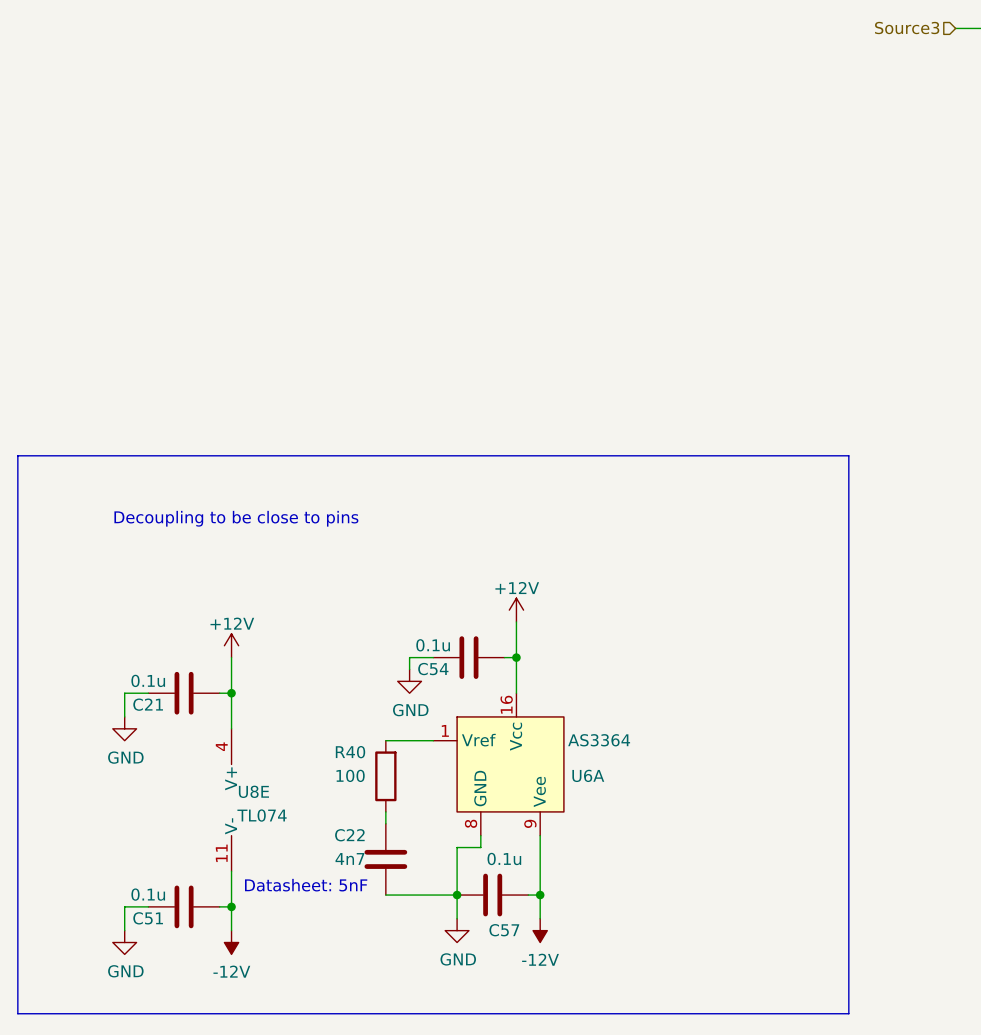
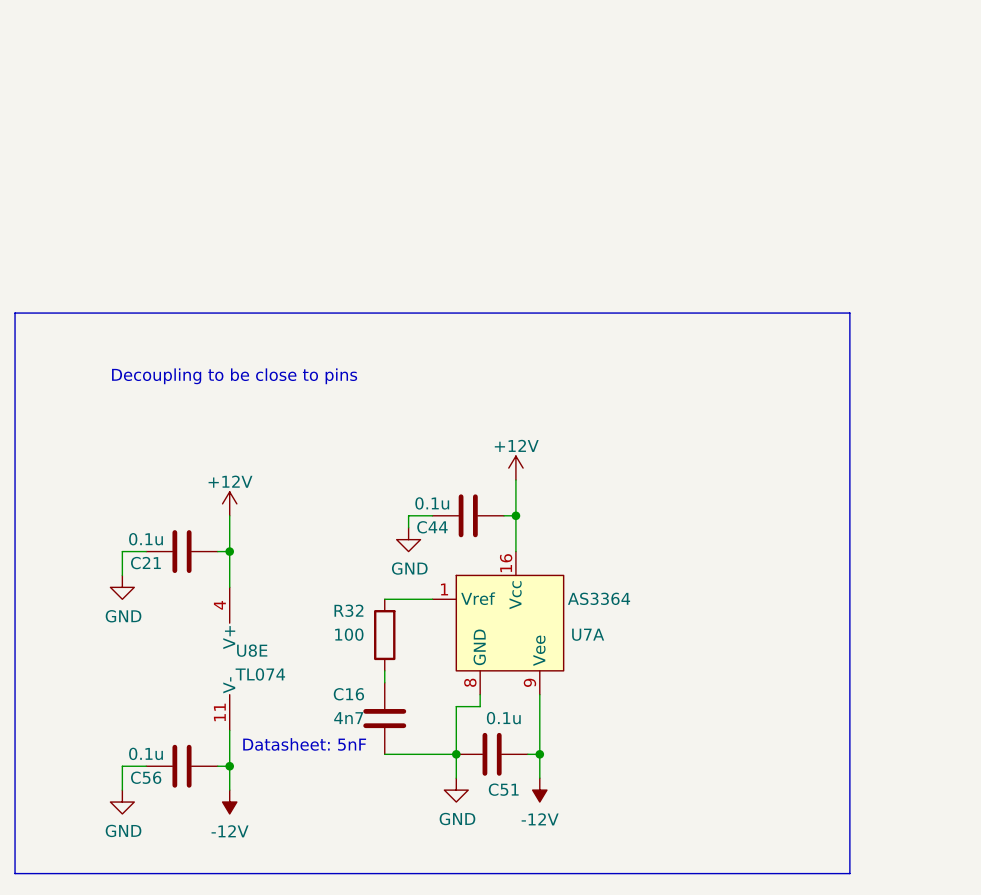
C54 name: C54 (433, 669) -> C44 (432, 527)
R40 name: R40 (350, 752) -> R32 (348, 610)
U6A name: U6A (588, 775) -> U7A (588, 634)
C22 name: C22 (349, 835) -> C16 (348, 694)
C51 name: C51 (148, 918) -> C56 (146, 777)
C57 name: C57 (504, 930) -> C51 (503, 789)

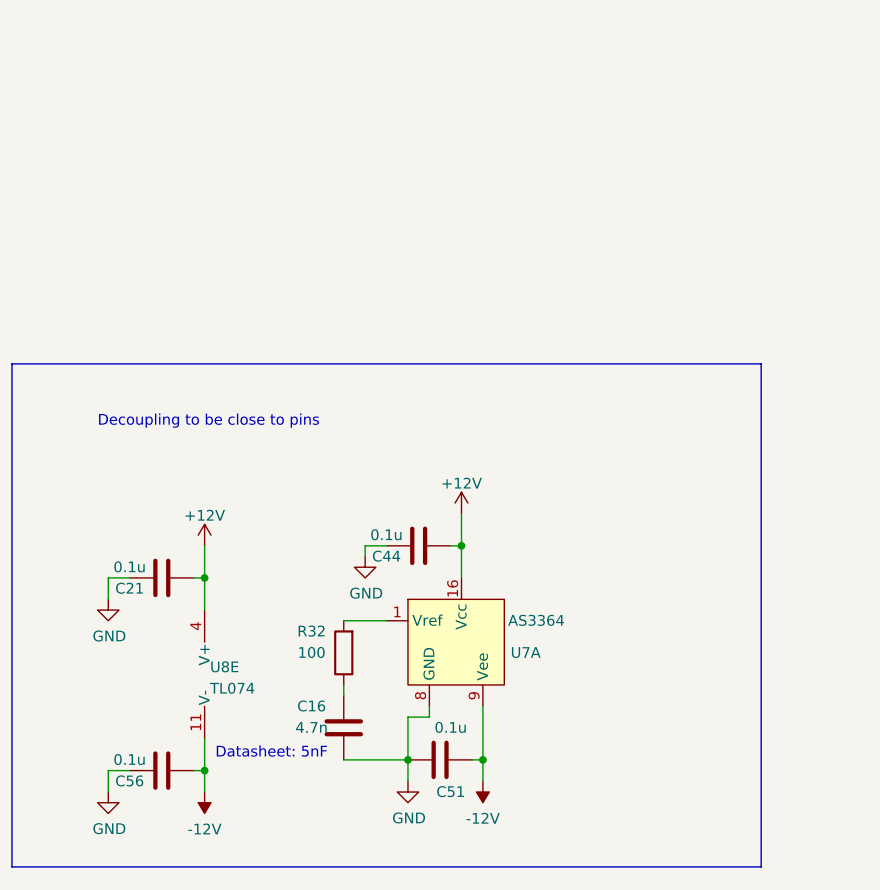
C16 value: 4n7 (348, 718) -> 4.7n (311, 727)

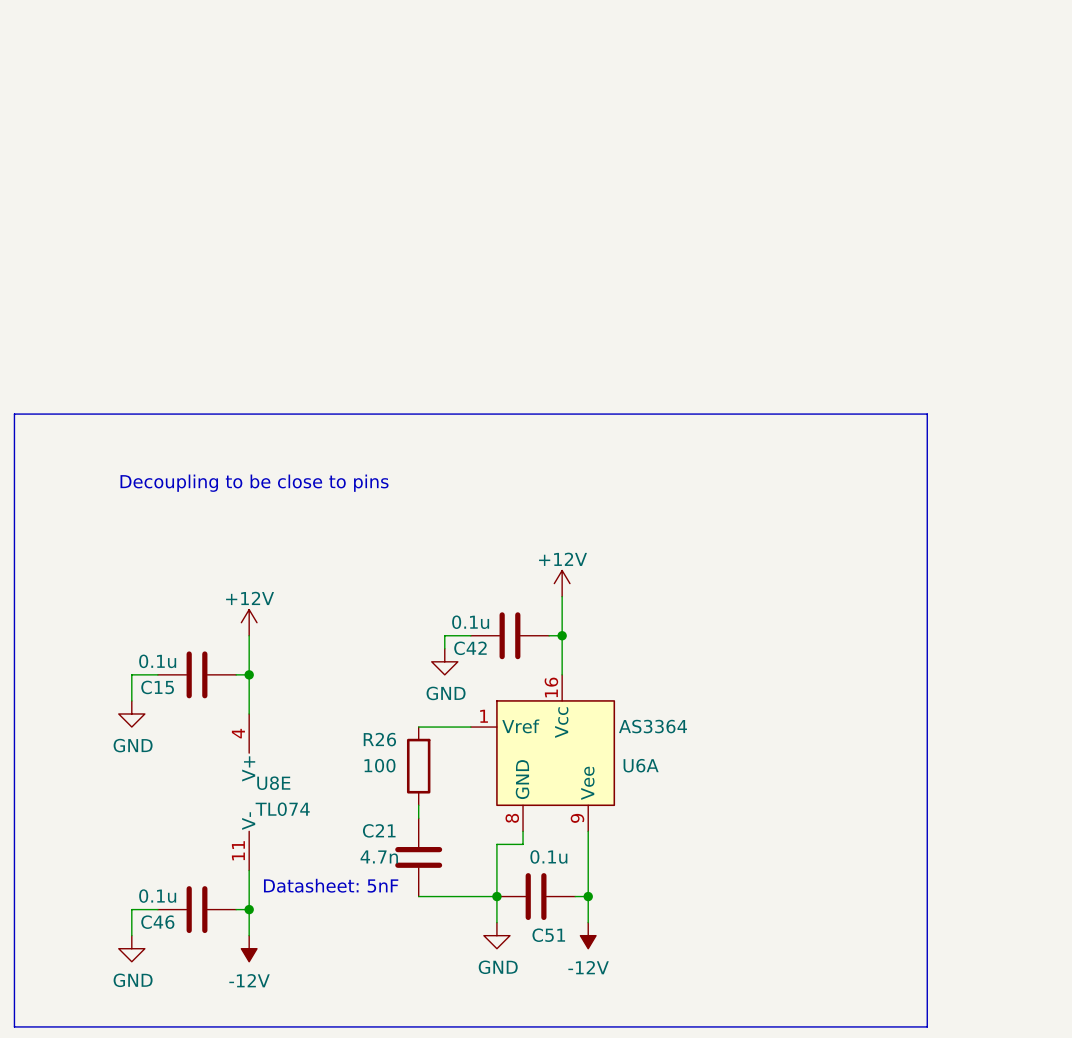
C44 name: C44 (386, 556) -> C42 (470, 648)
C21 name: C21 (129, 588) -> C15 (157, 687)
R32 name: R32 (311, 631) -> R26 (379, 739)
U7A name: U7A (526, 652) -> U6A (641, 765)
C16 name: C16 (311, 705) -> C21 (379, 830)
C56 name: C56 (129, 780) -> C46 (157, 922)

